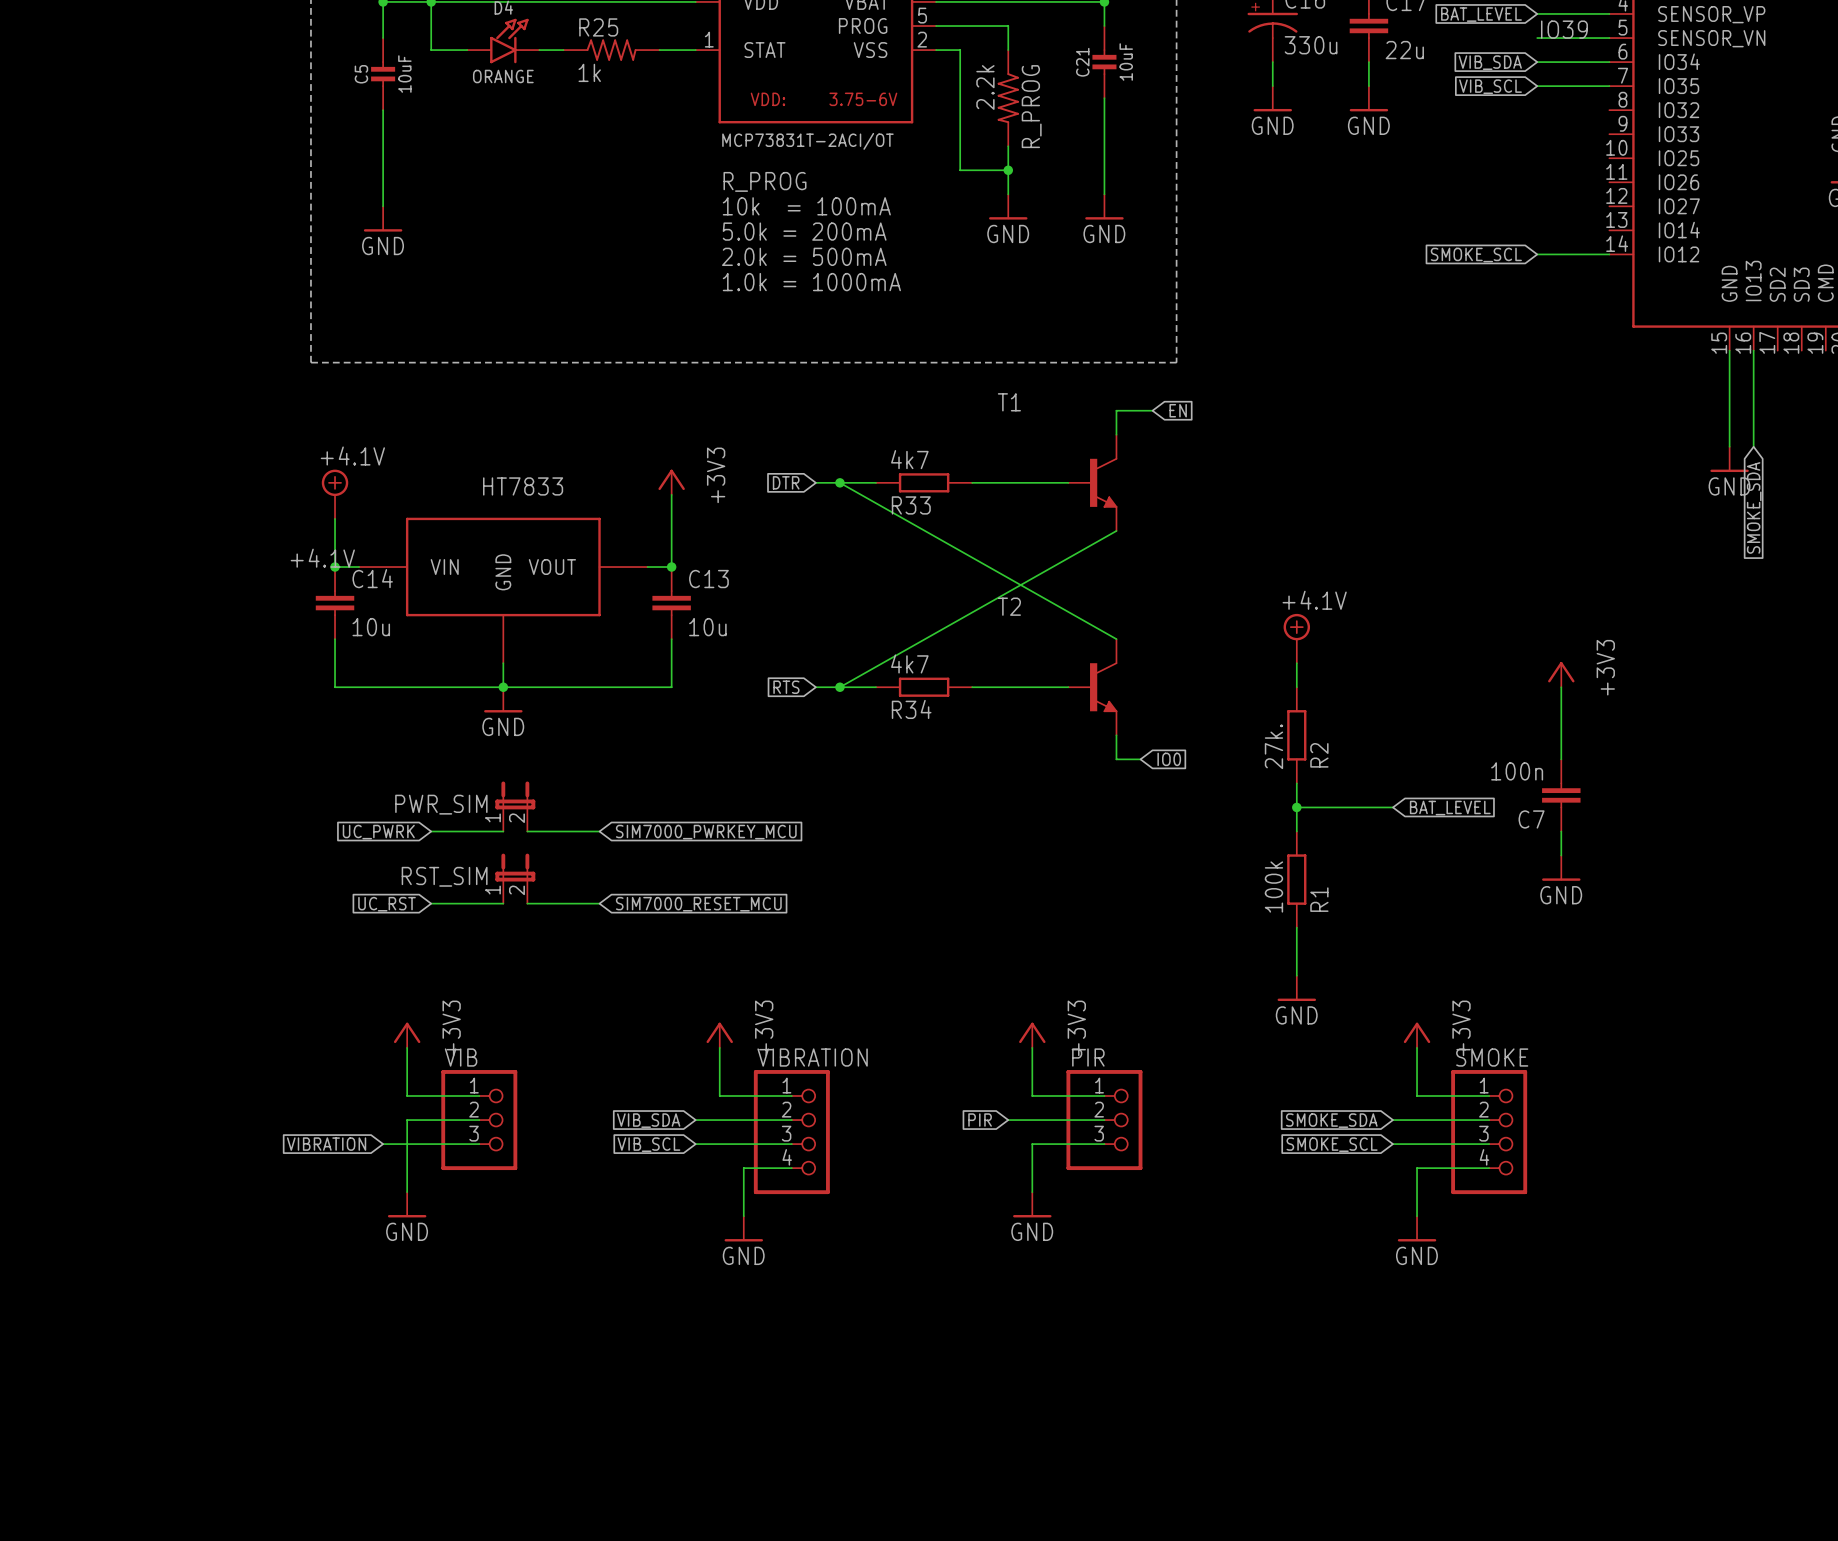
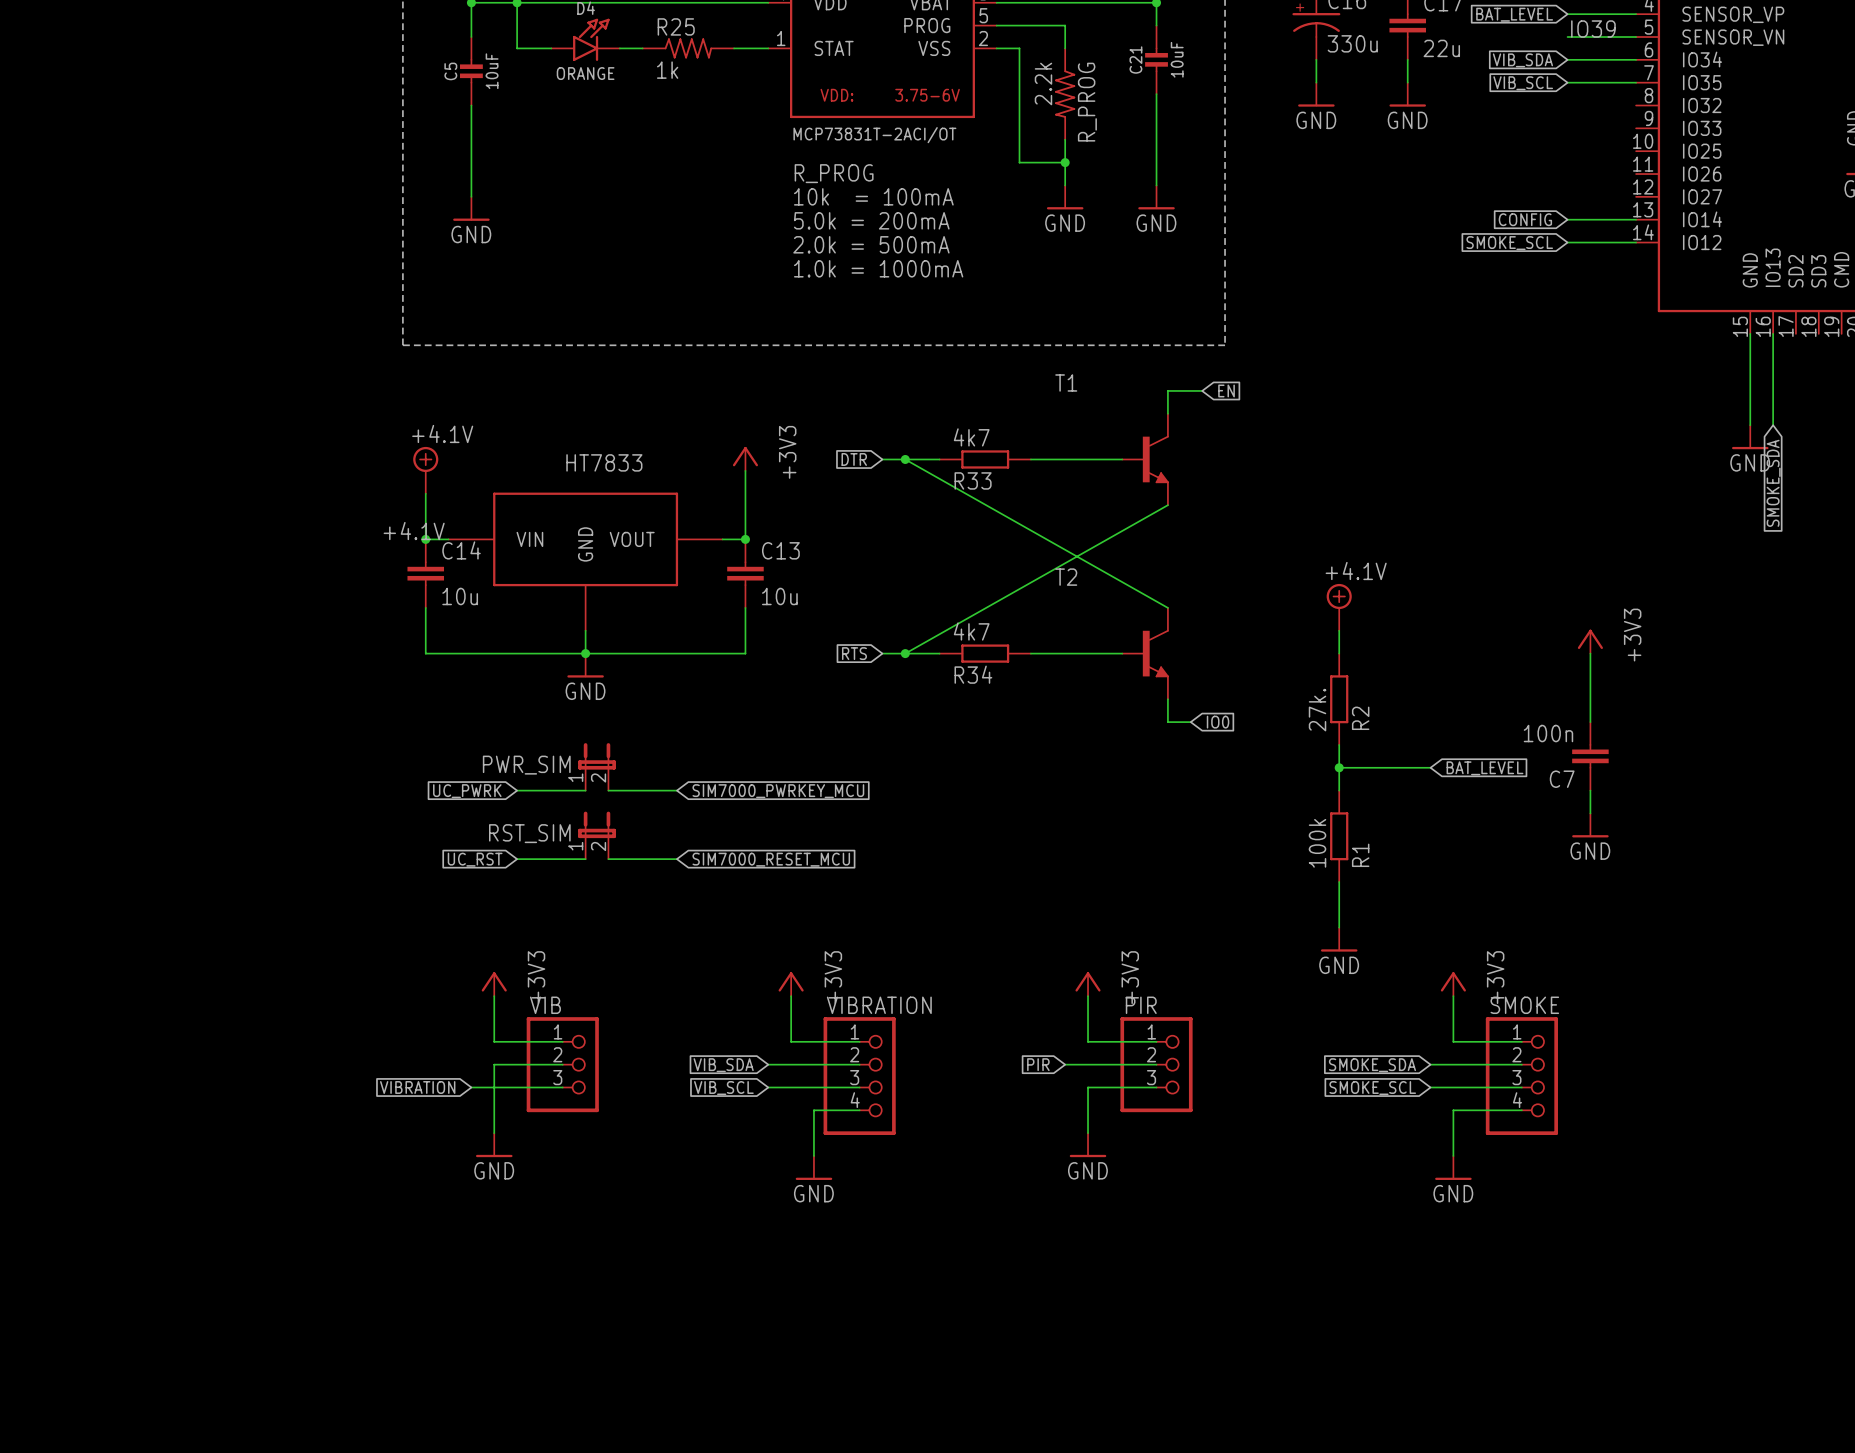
global label: none -> CONFIG (1525, 219)
wire: none -> (1567, 219) (1636, 219)

